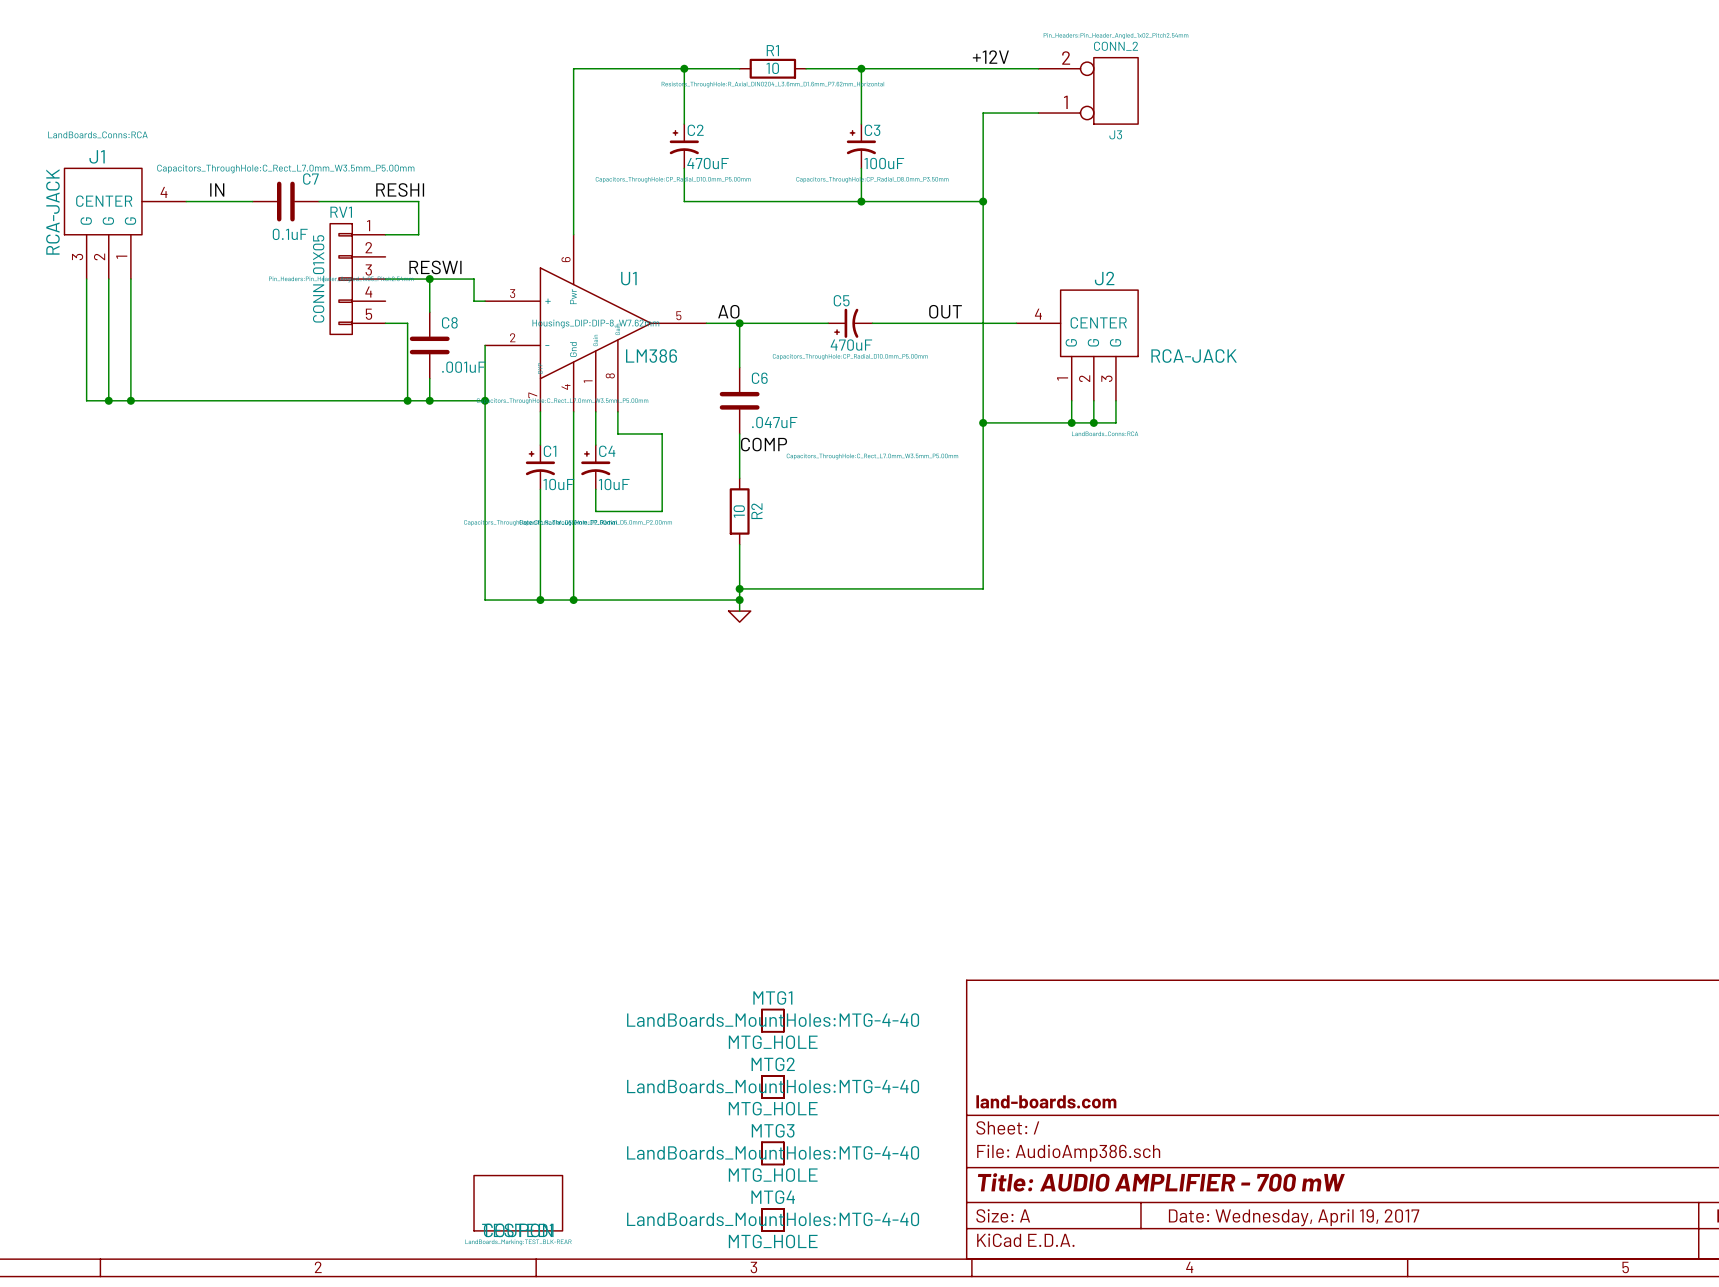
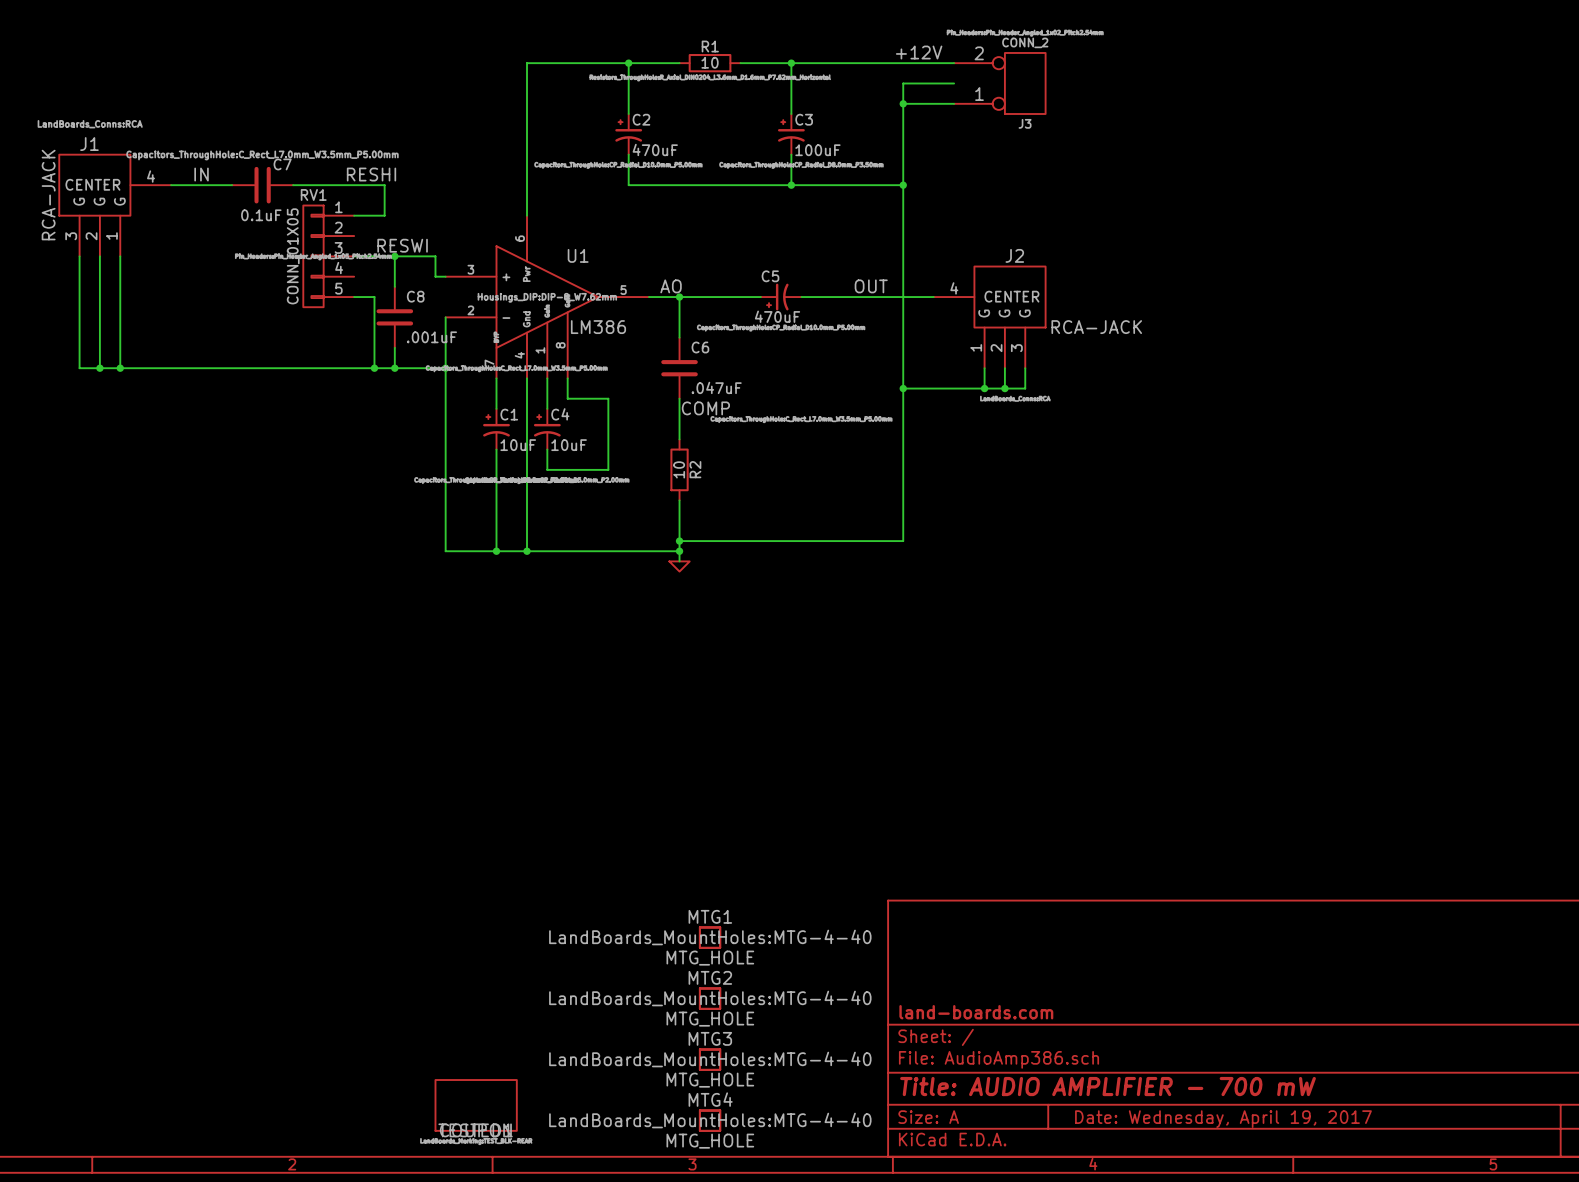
wire: none -> (954, 83) (903, 83) (903, 103)
junction: none -> (903, 103)

